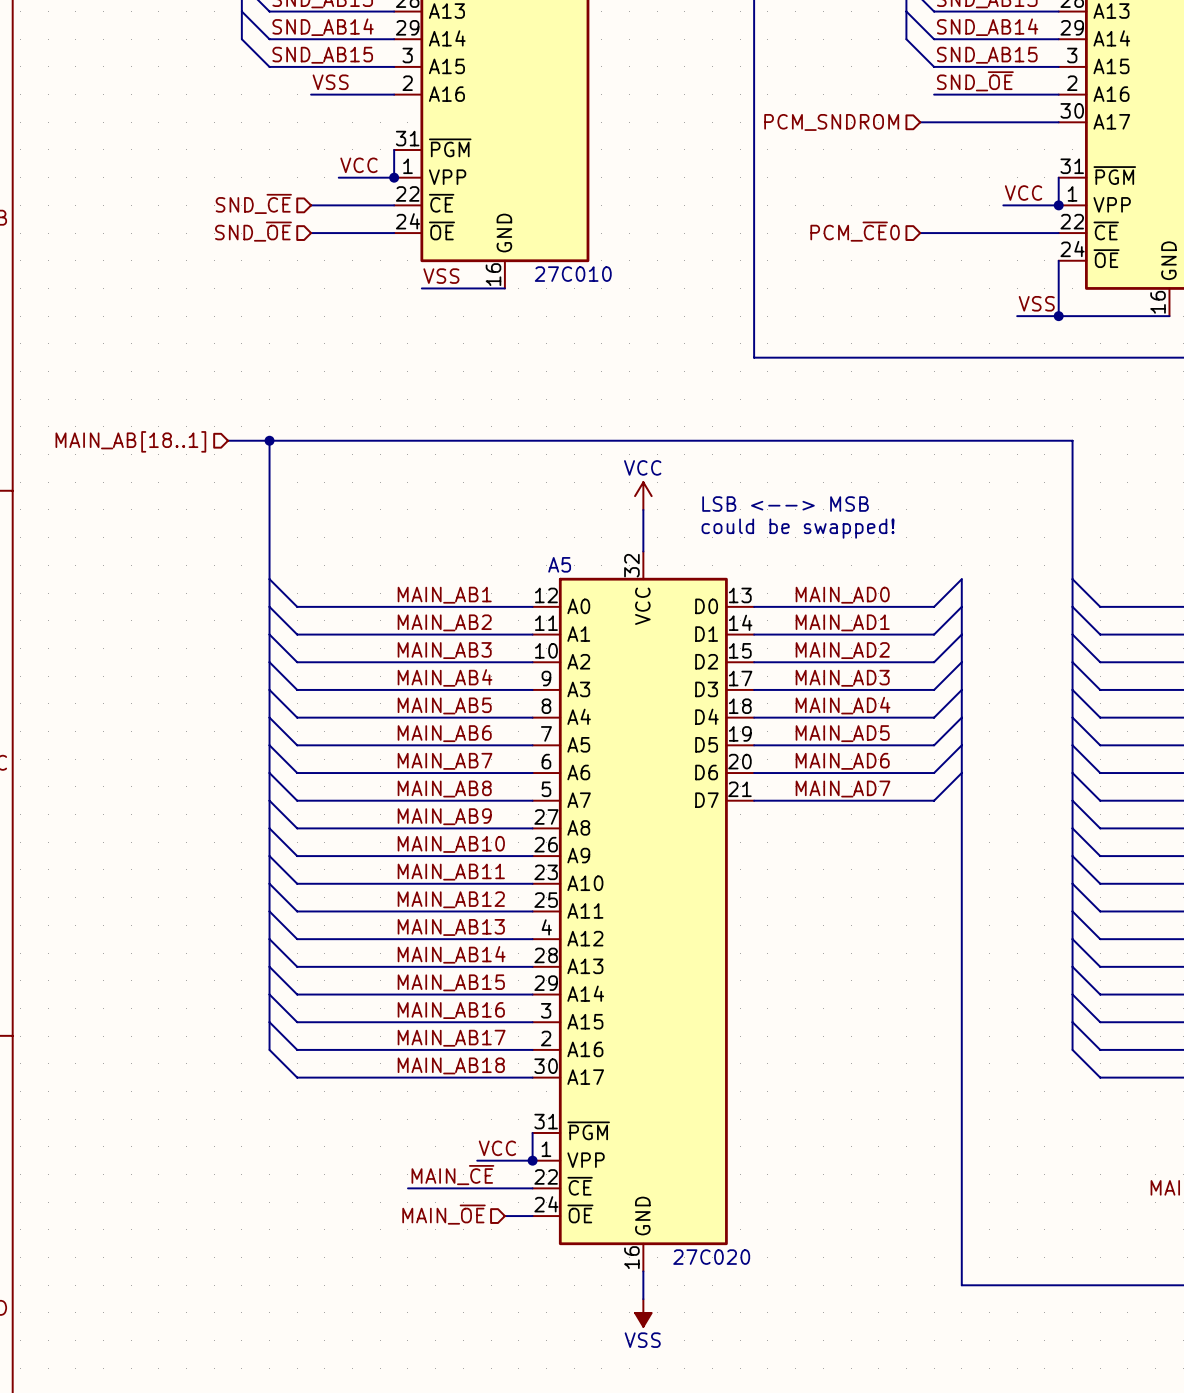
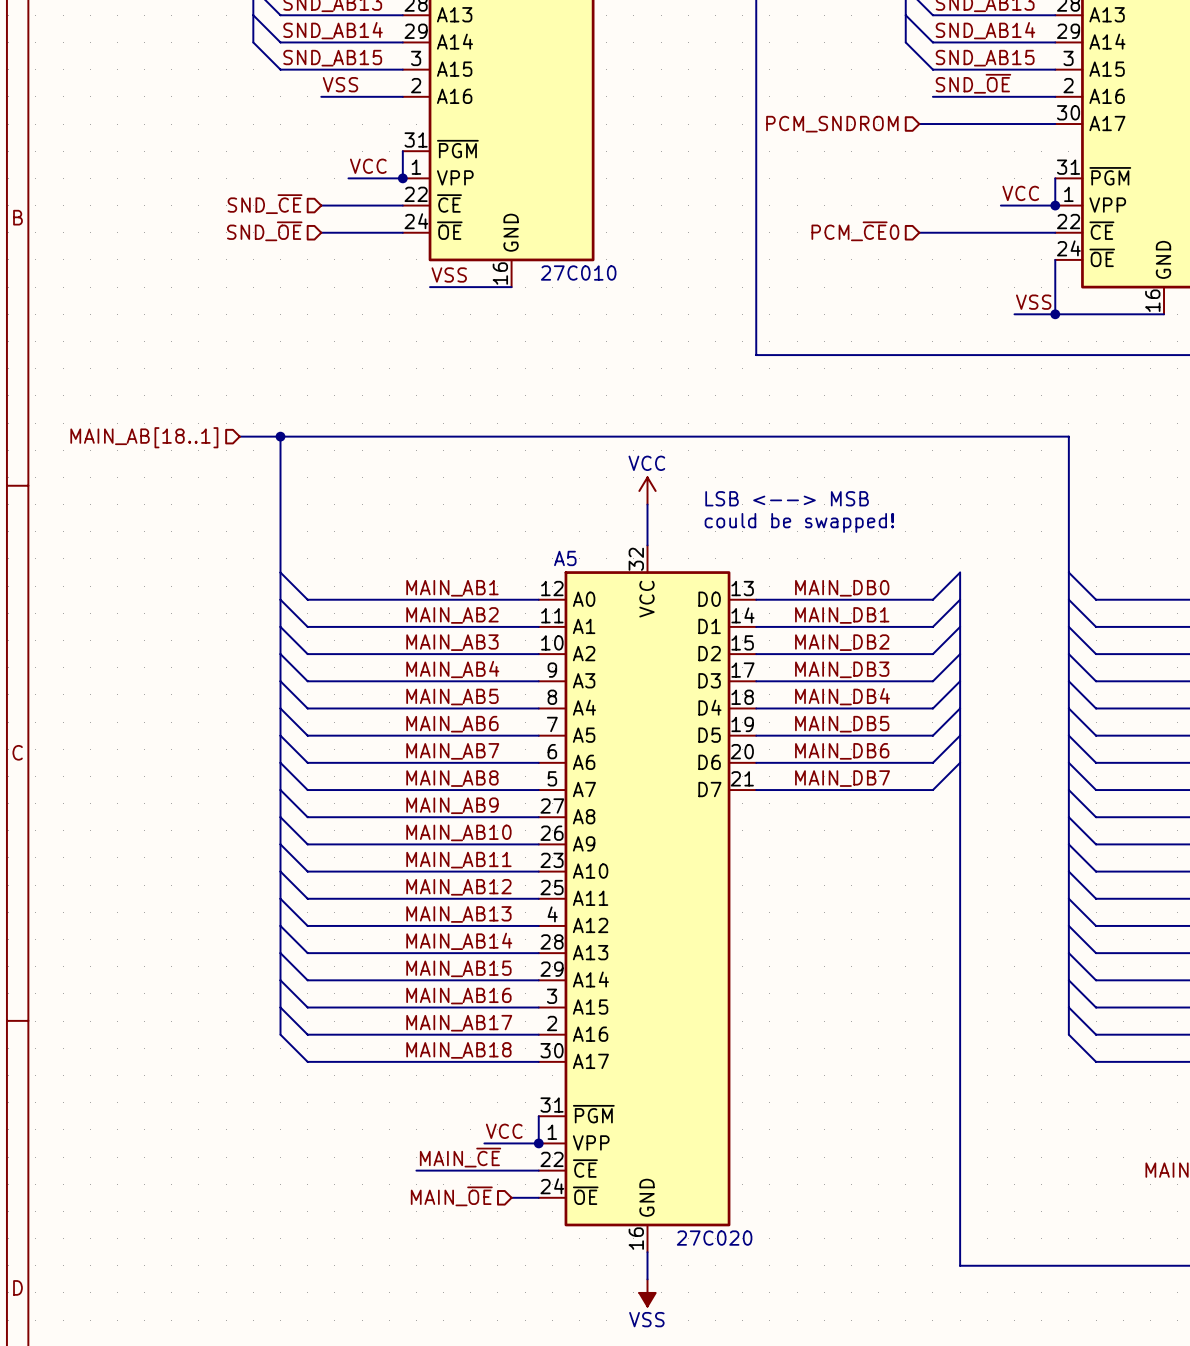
label: MAIN_AD0 (842, 595) -> MAIN_DB0 (842, 588)
label: MAIN_AD1 (842, 622) -> MAIN_DB1 (842, 615)
label: MAIN_AD2 (842, 650) -> MAIN_DB2 (842, 642)
label: MAIN_AD3 (842, 678) -> MAIN_DB3 (842, 669)
label: MAIN_AD4 (843, 705) -> MAIN_DB4 (842, 696)
label: MAIN_AD5 (842, 733) -> MAIN_DB5 (842, 724)
label: MAIN_AD6 (842, 761) -> MAIN_DB6 (842, 751)
label: MAIN_AD7 (843, 789) -> MAIN_DB7 (842, 778)

